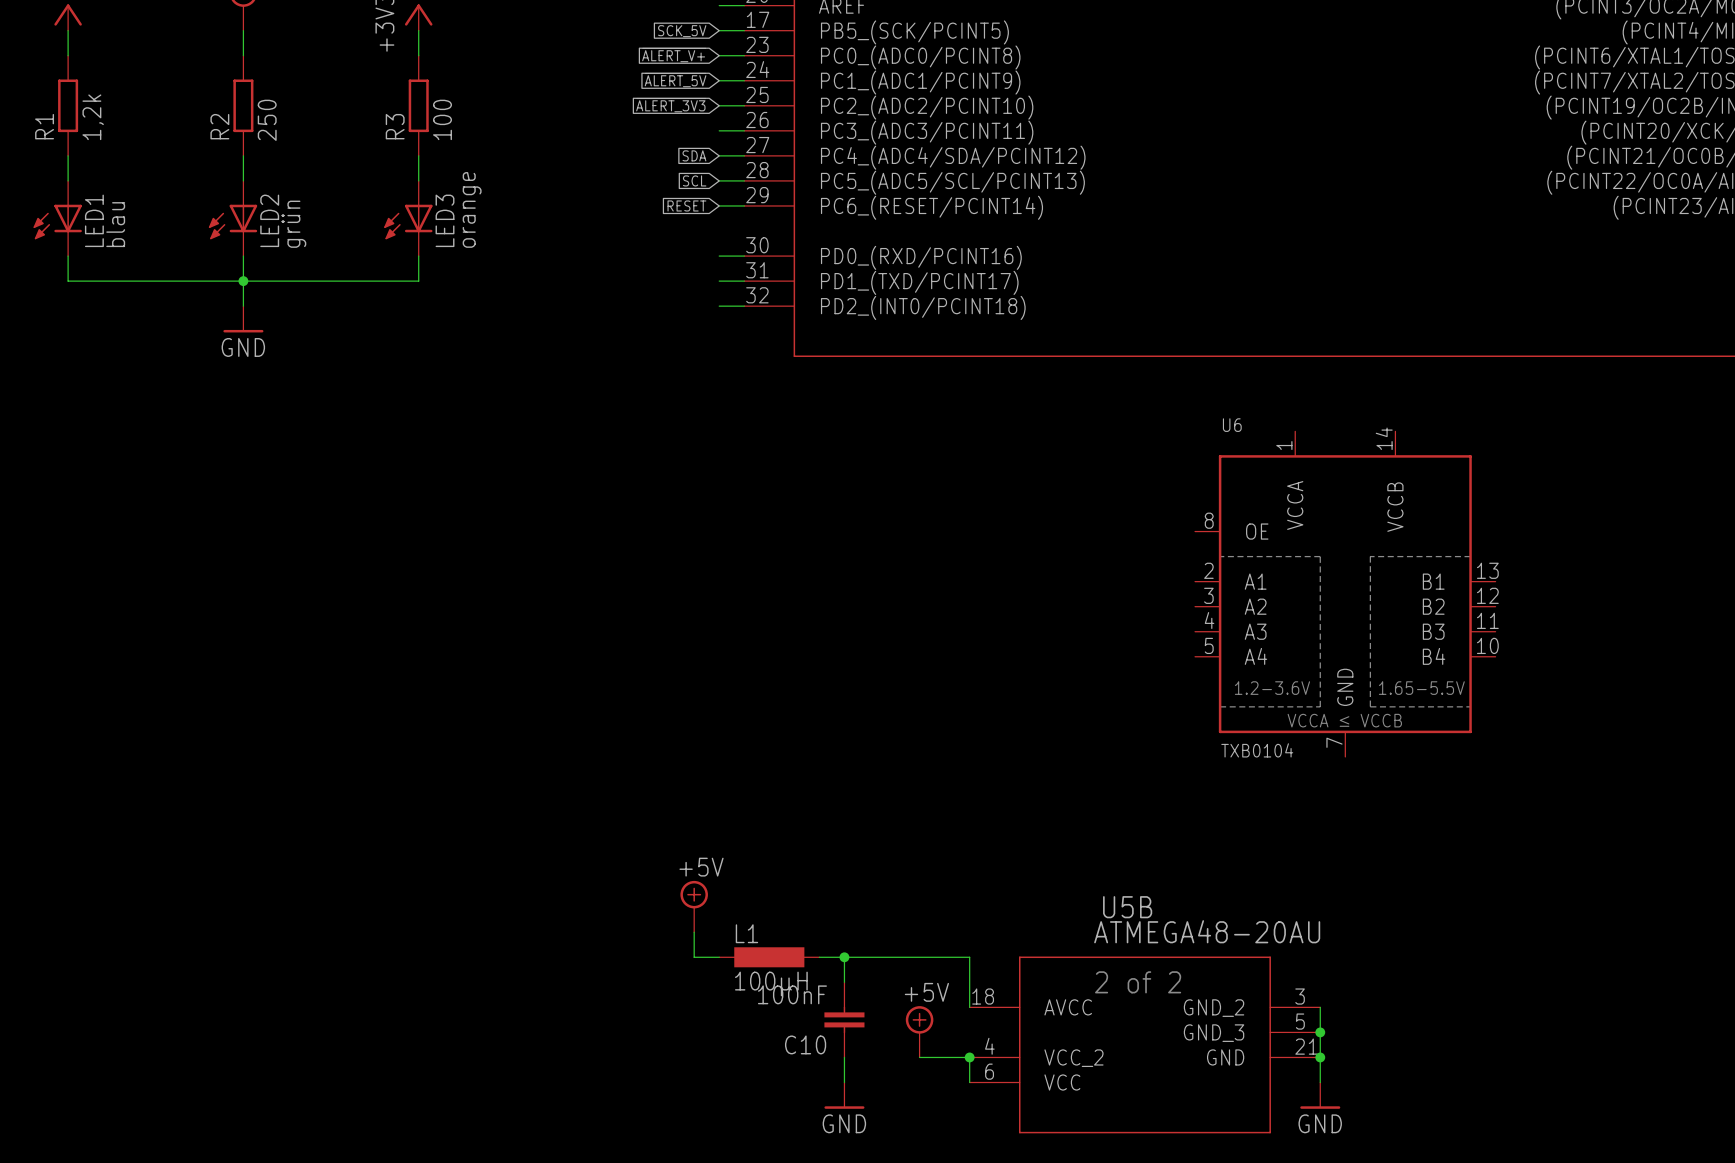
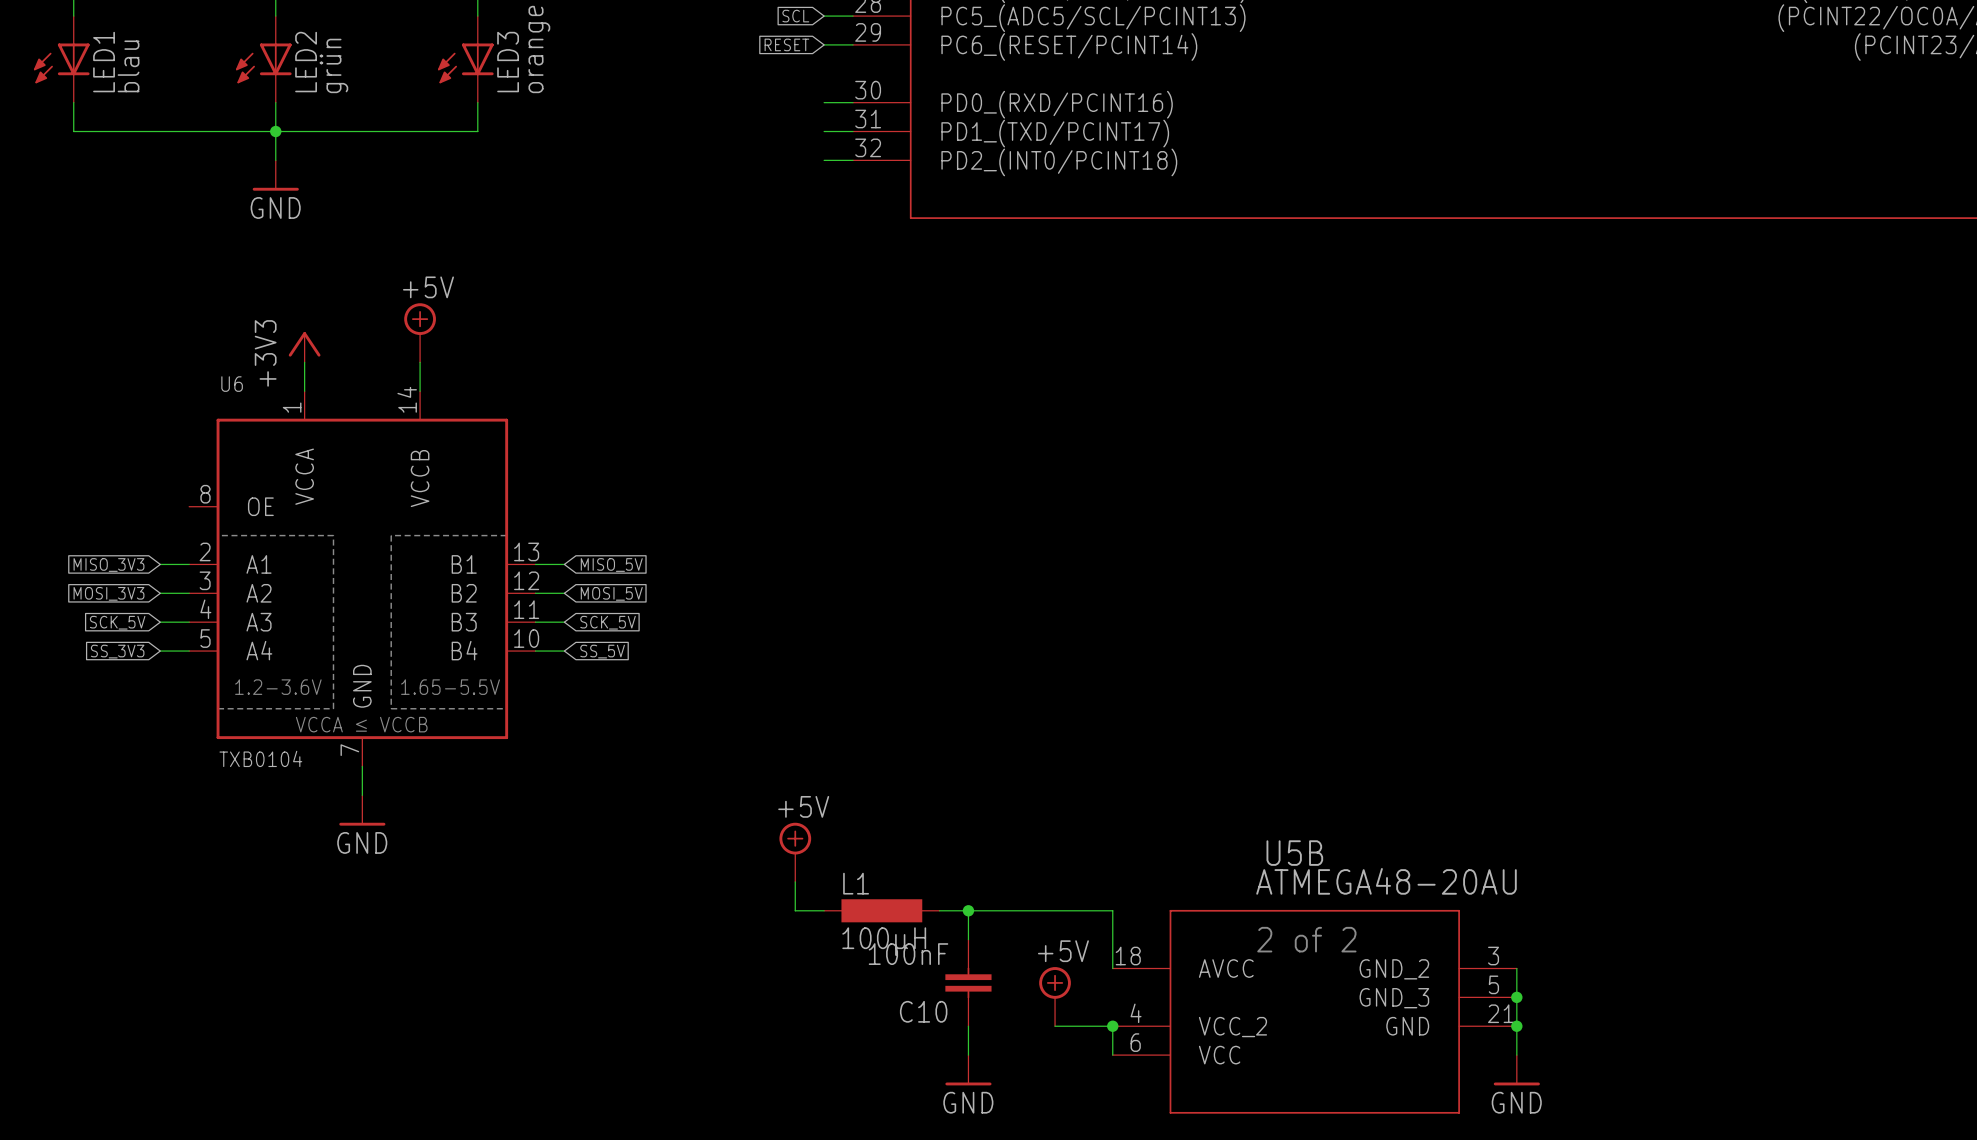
power symbol: none -> +5V (420, 332)
power symbol: none -> +3V3 (304, 347)
wire: none -> (304, 362) (304, 391)
wire: none -> (420, 362) (420, 391)
U6 position: (1345, 594) -> (362, 578)
wire: none -> (160, 564) (189, 564)
wire: none -> (535, 564) (564, 564)
global label: none -> MISO_3V3 (108, 564)
global label: none -> MISO_5V (611, 564)
wire: none -> (160, 593) (189, 593)
wire: none -> (535, 593) (564, 593)
global label: none -> MOSI_3V3 (108, 593)
global label: none -> MOSI_5V (611, 593)
wire: none -> (160, 622) (189, 622)
wire: none -> (535, 622) (564, 622)
global label: none -> SCK_5V (117, 622)
global label: none -> SCK_5V (608, 622)
wire: none -> (160, 651) (189, 651)
wire: none -> (535, 651) (564, 651)
global label: none -> SS_3V3 (117, 651)
global label: none -> SS_5V (602, 651)
wire: none -> (362, 766) (362, 795)
power symbol: none -> GND (362, 810)

